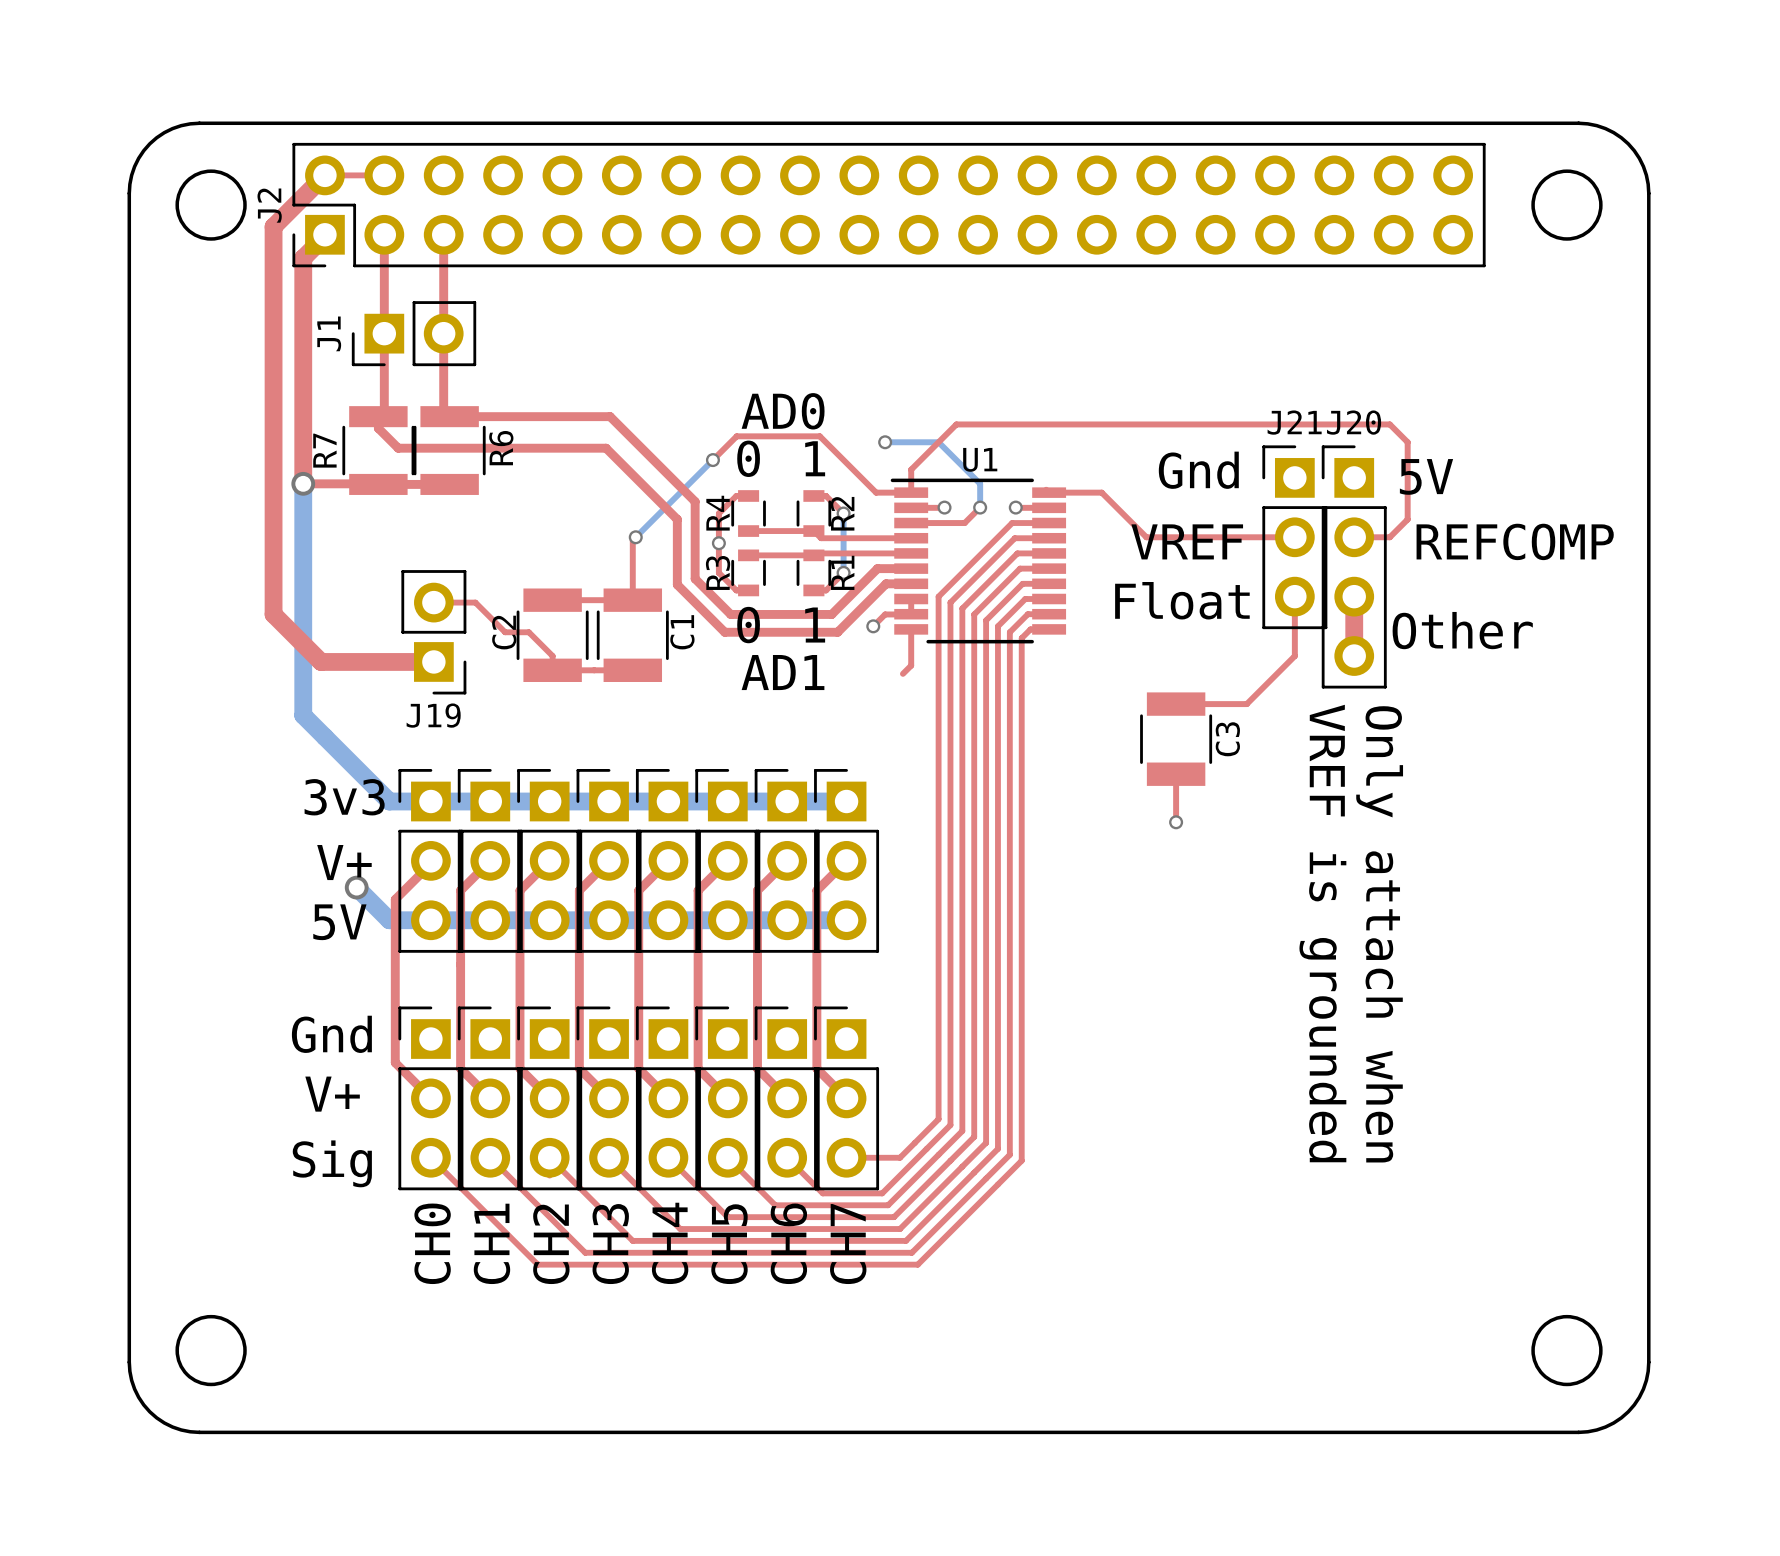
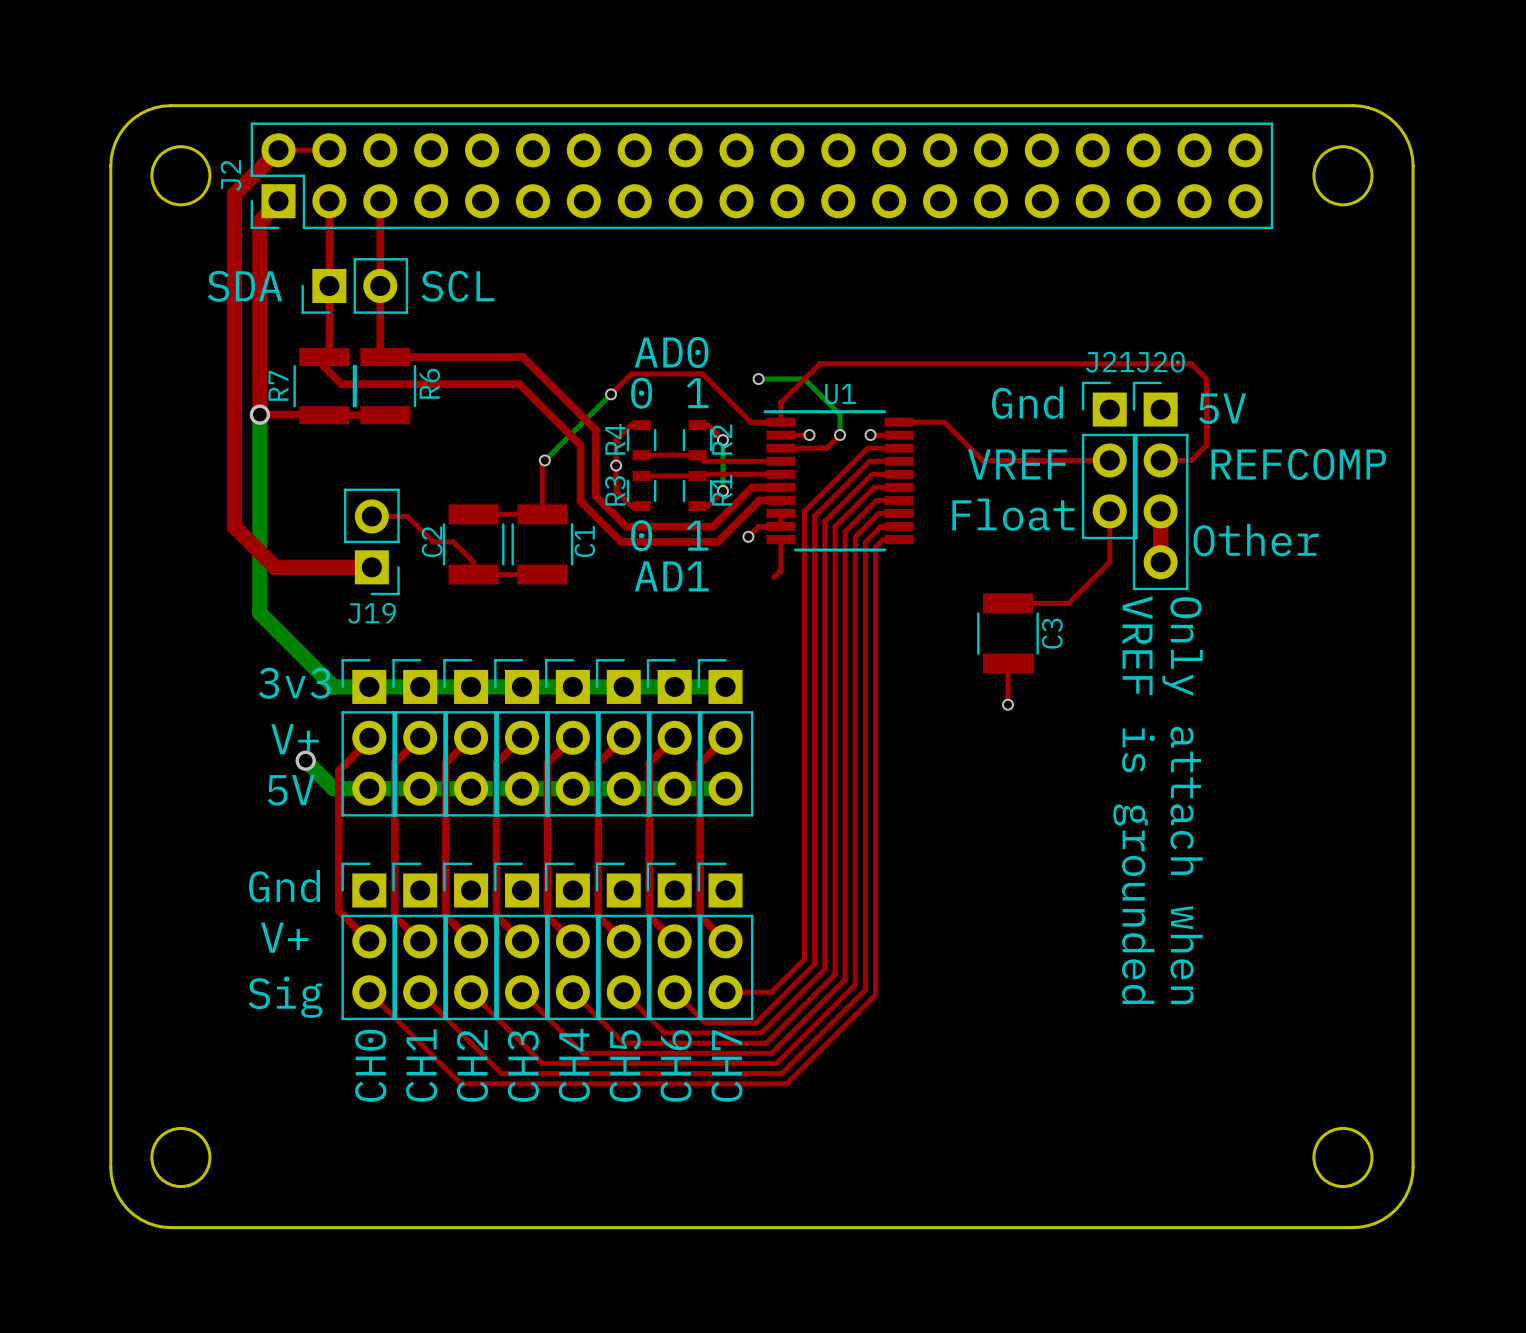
J1 name: J1 (329, 333) -> none
text: none -> SDA (244, 286)
text: none -> SCL (457, 286)

